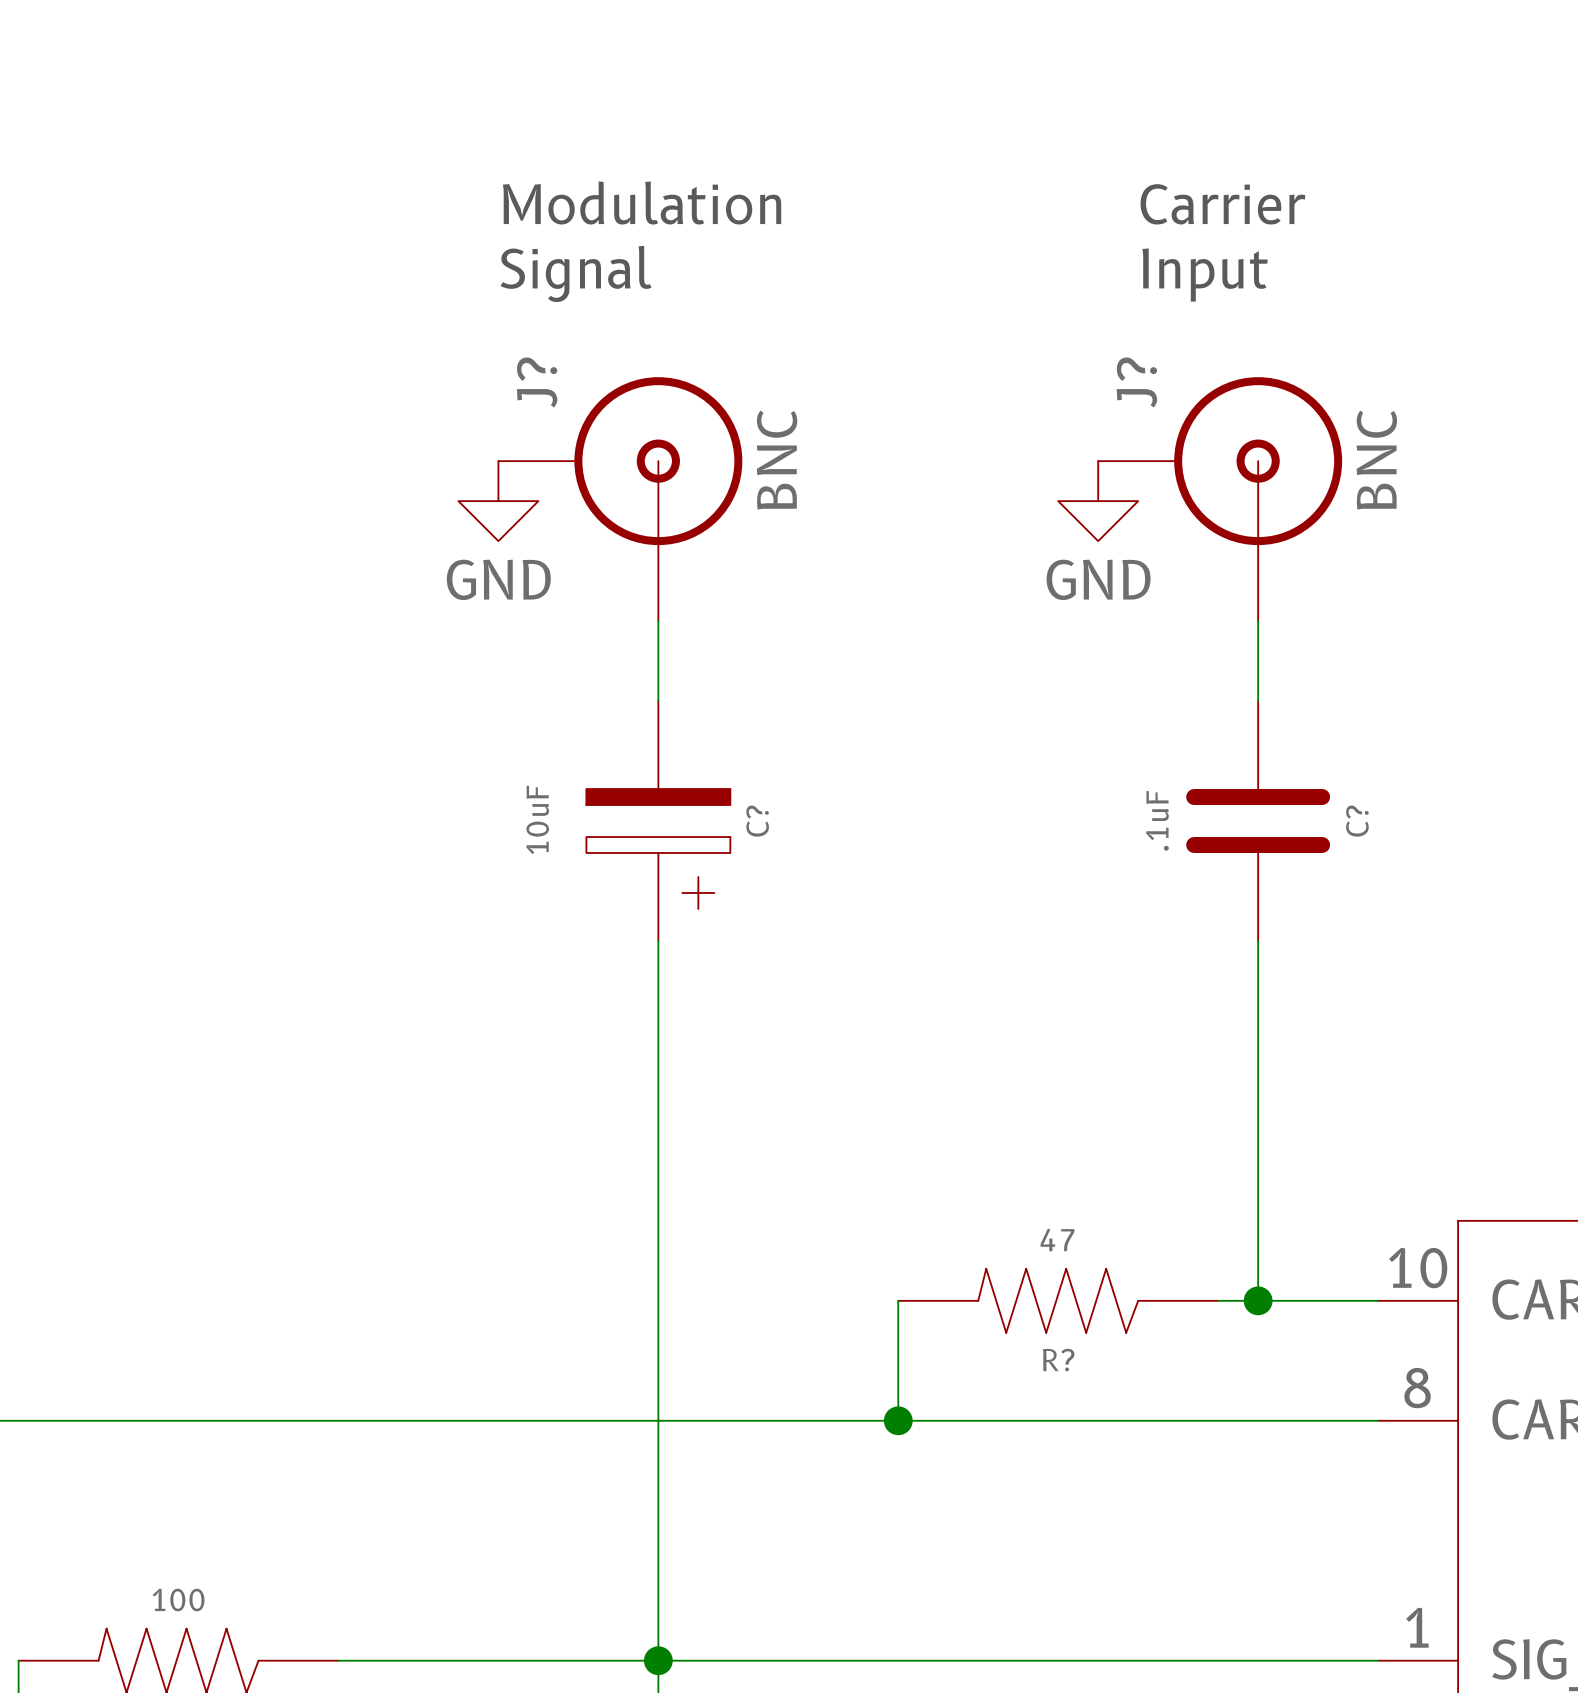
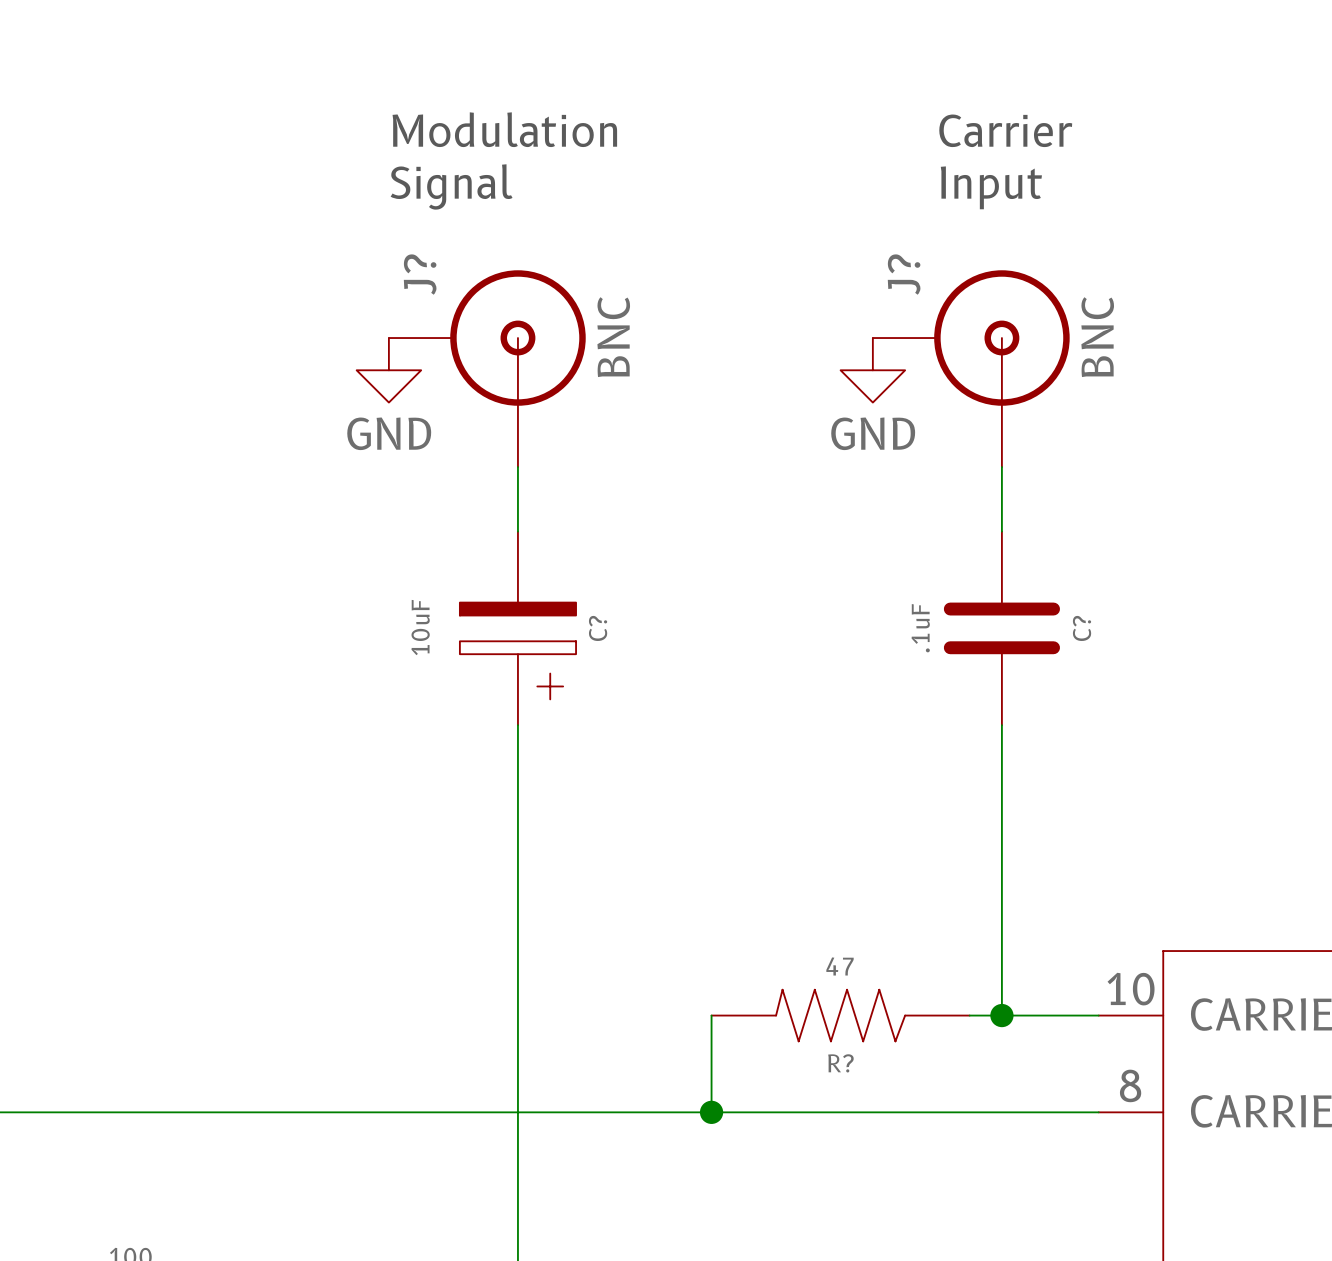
text position: Carrier (1222, 204) -> Carrier (1005, 130)
text position: Input (1205, 275) -> Input (991, 187)

